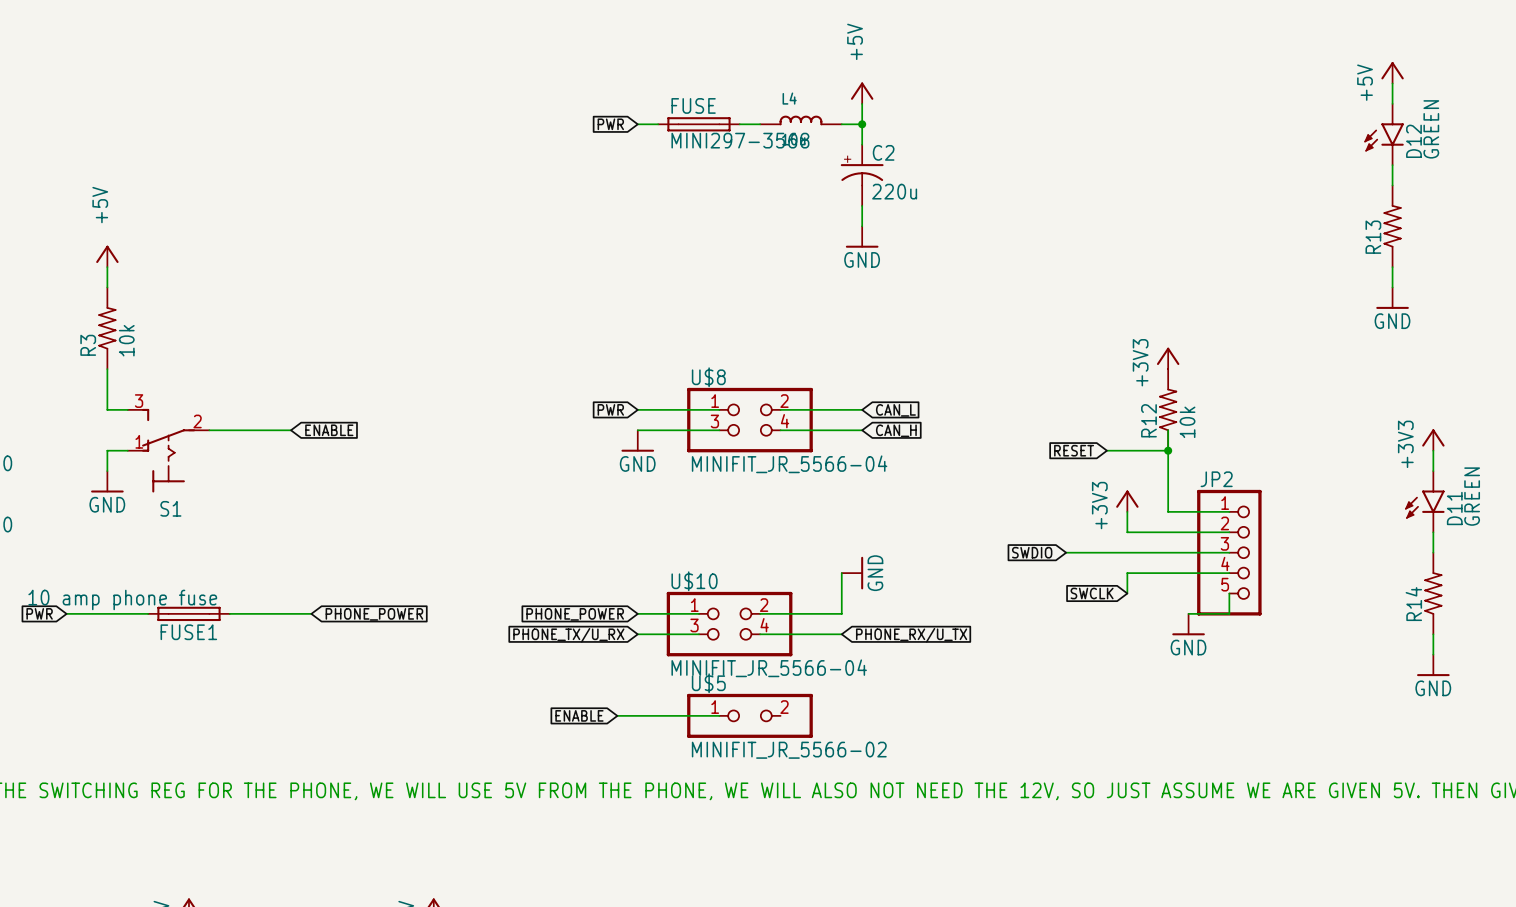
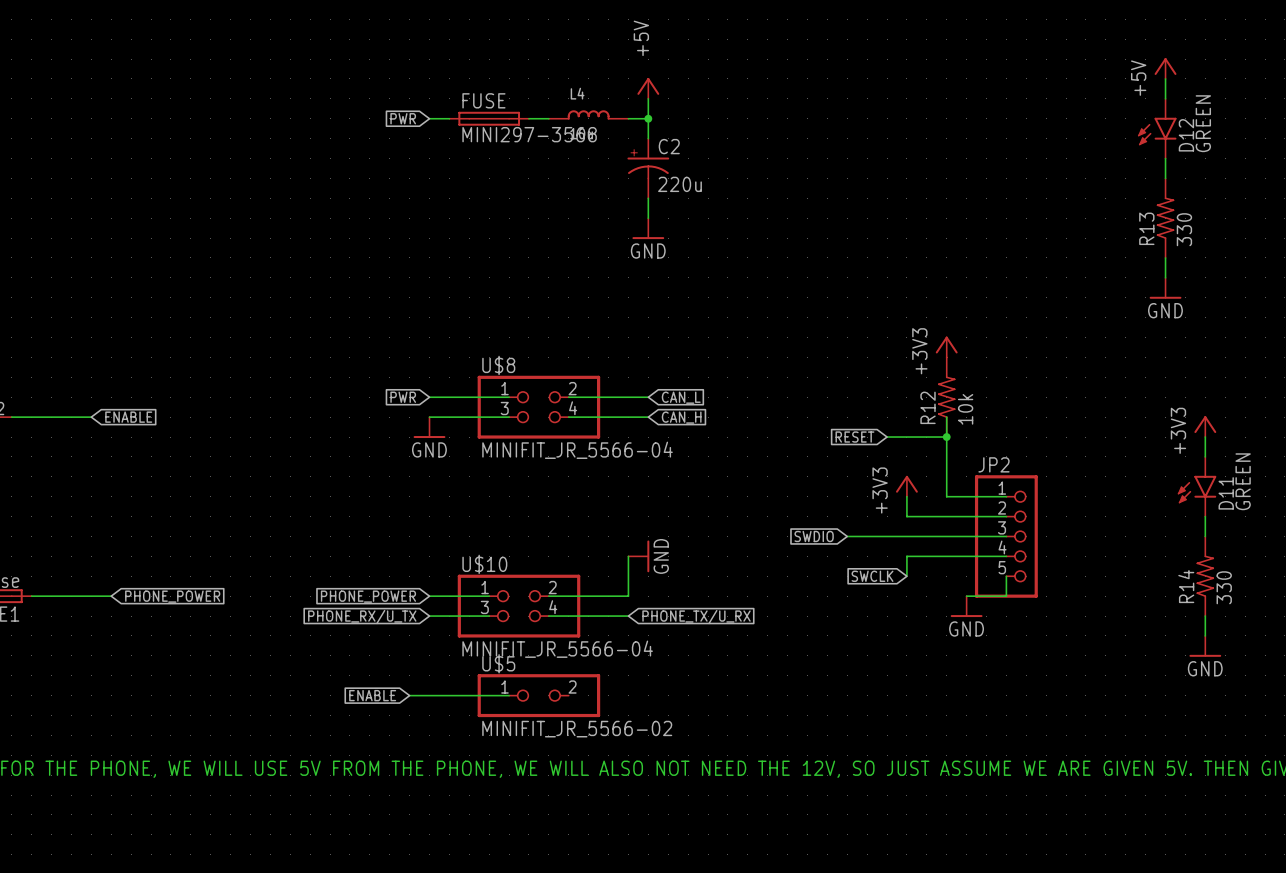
R13 value: none -> 330 (1184, 229)
R14 value: none -> 330 (1224, 587)
global label: PHONE_TX/U_RX (568, 635) -> PHONE_RX/U_TX (362, 617)
global label: PHONE_RX/U_TX (911, 635) -> PHONE_TX/U_RX (696, 617)

